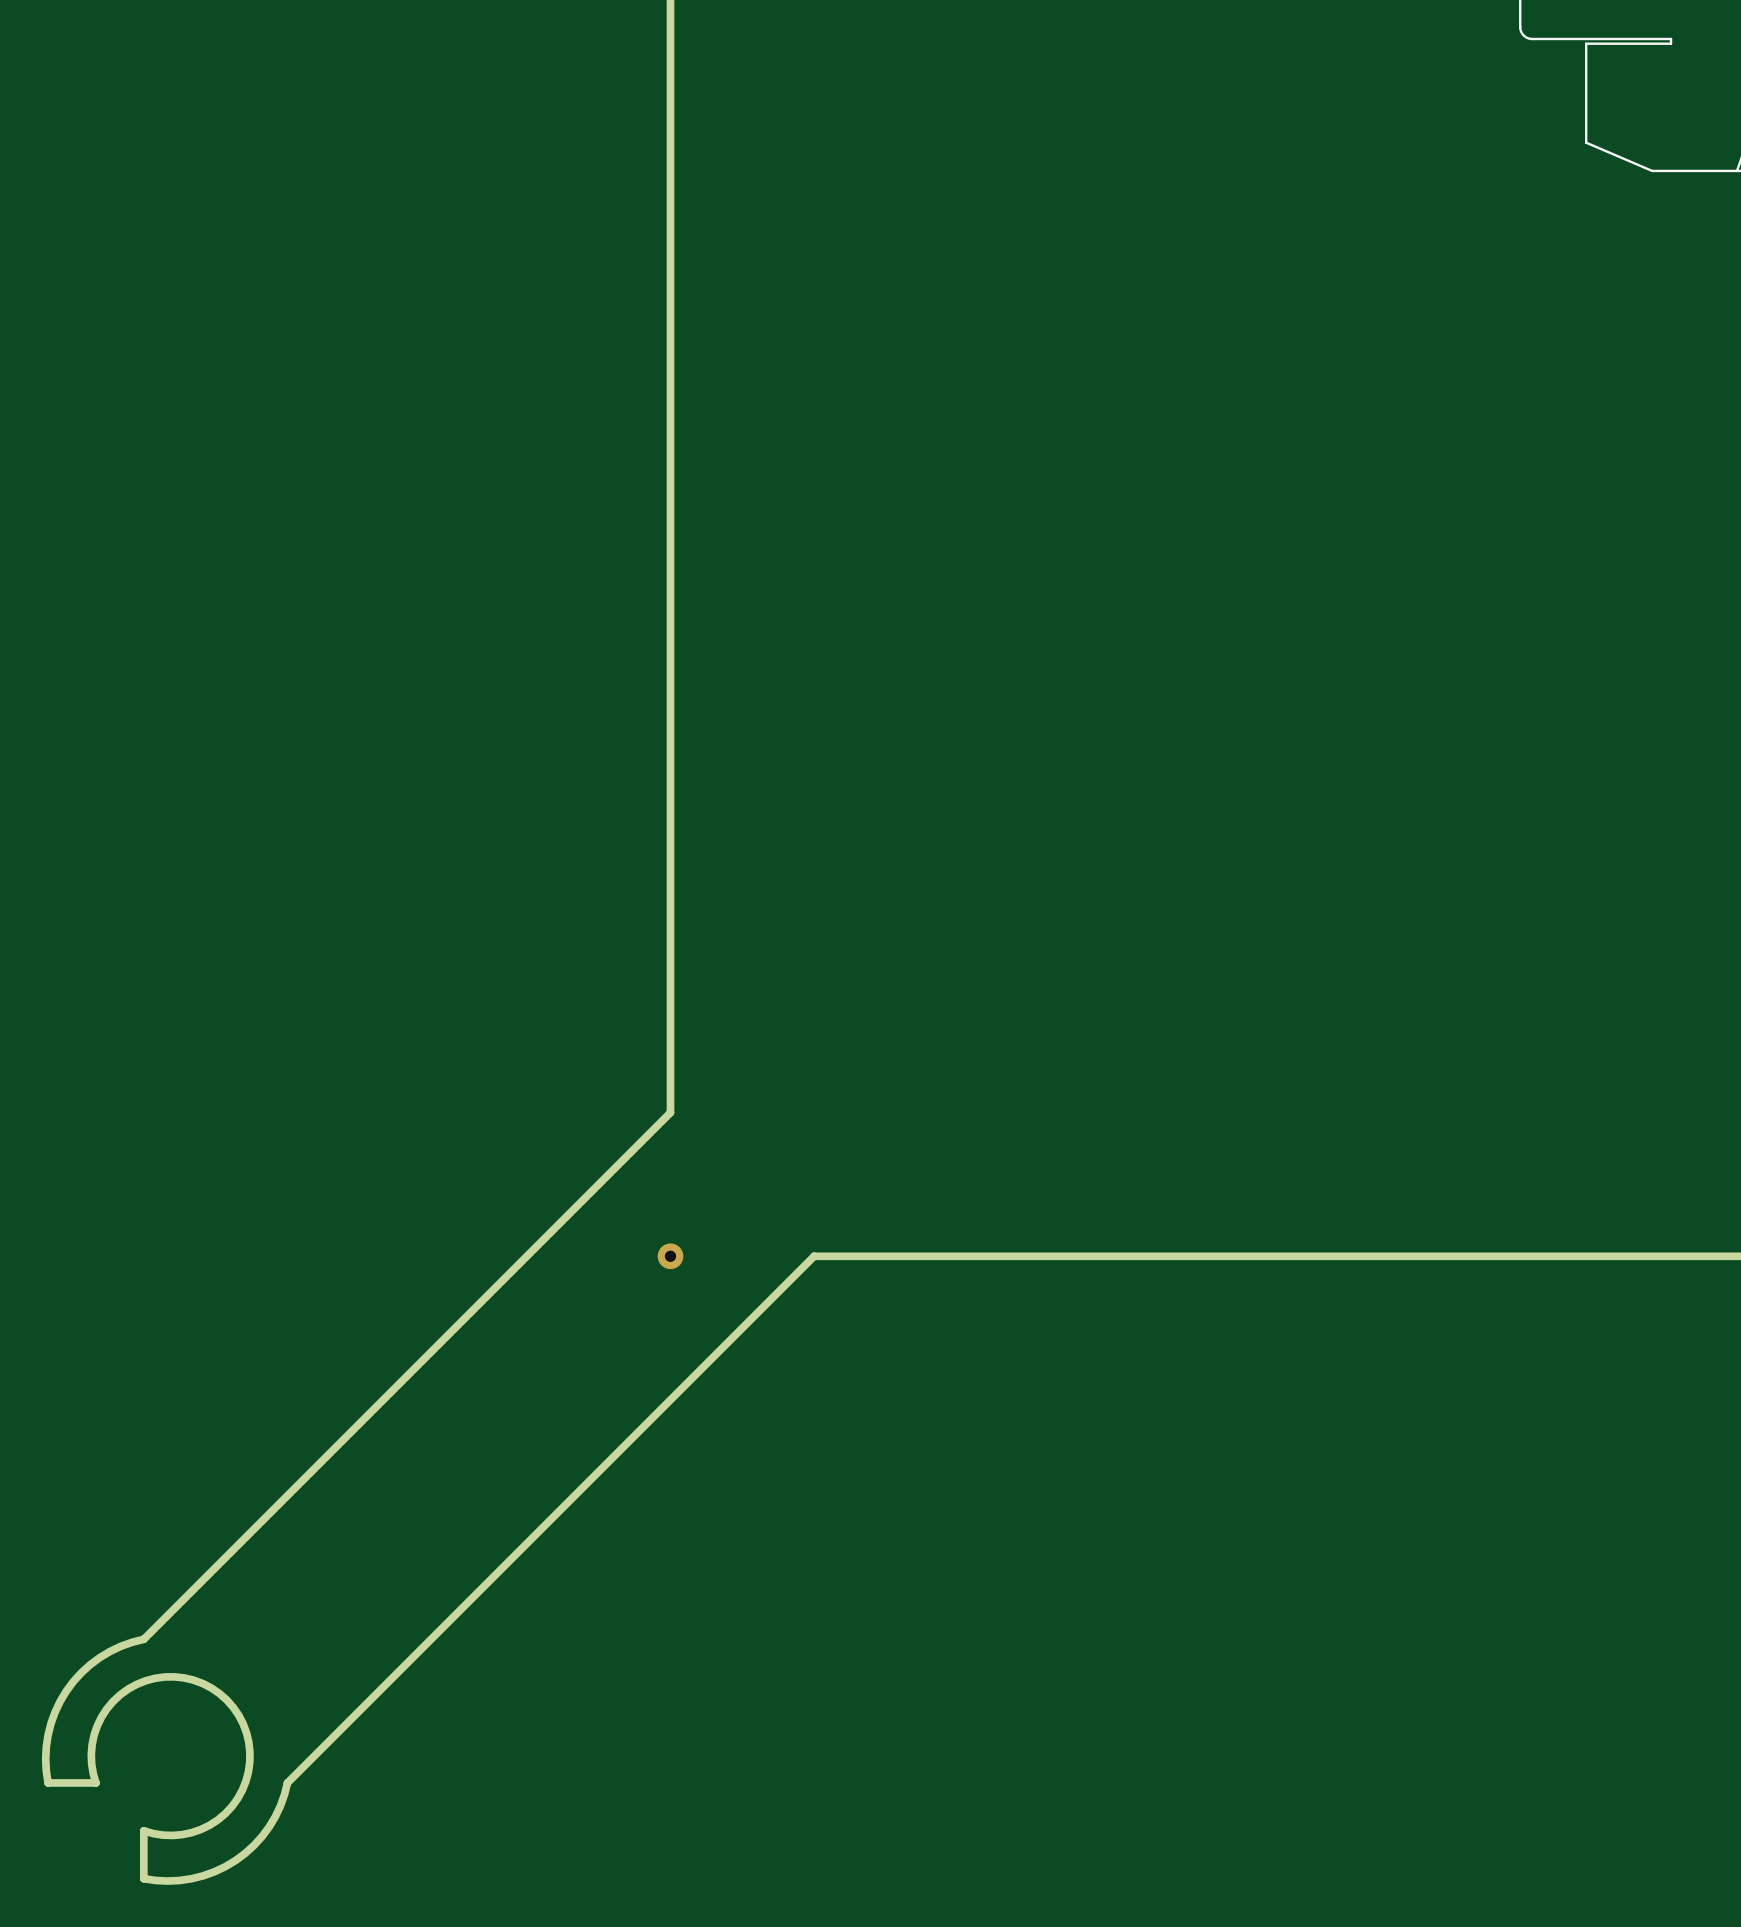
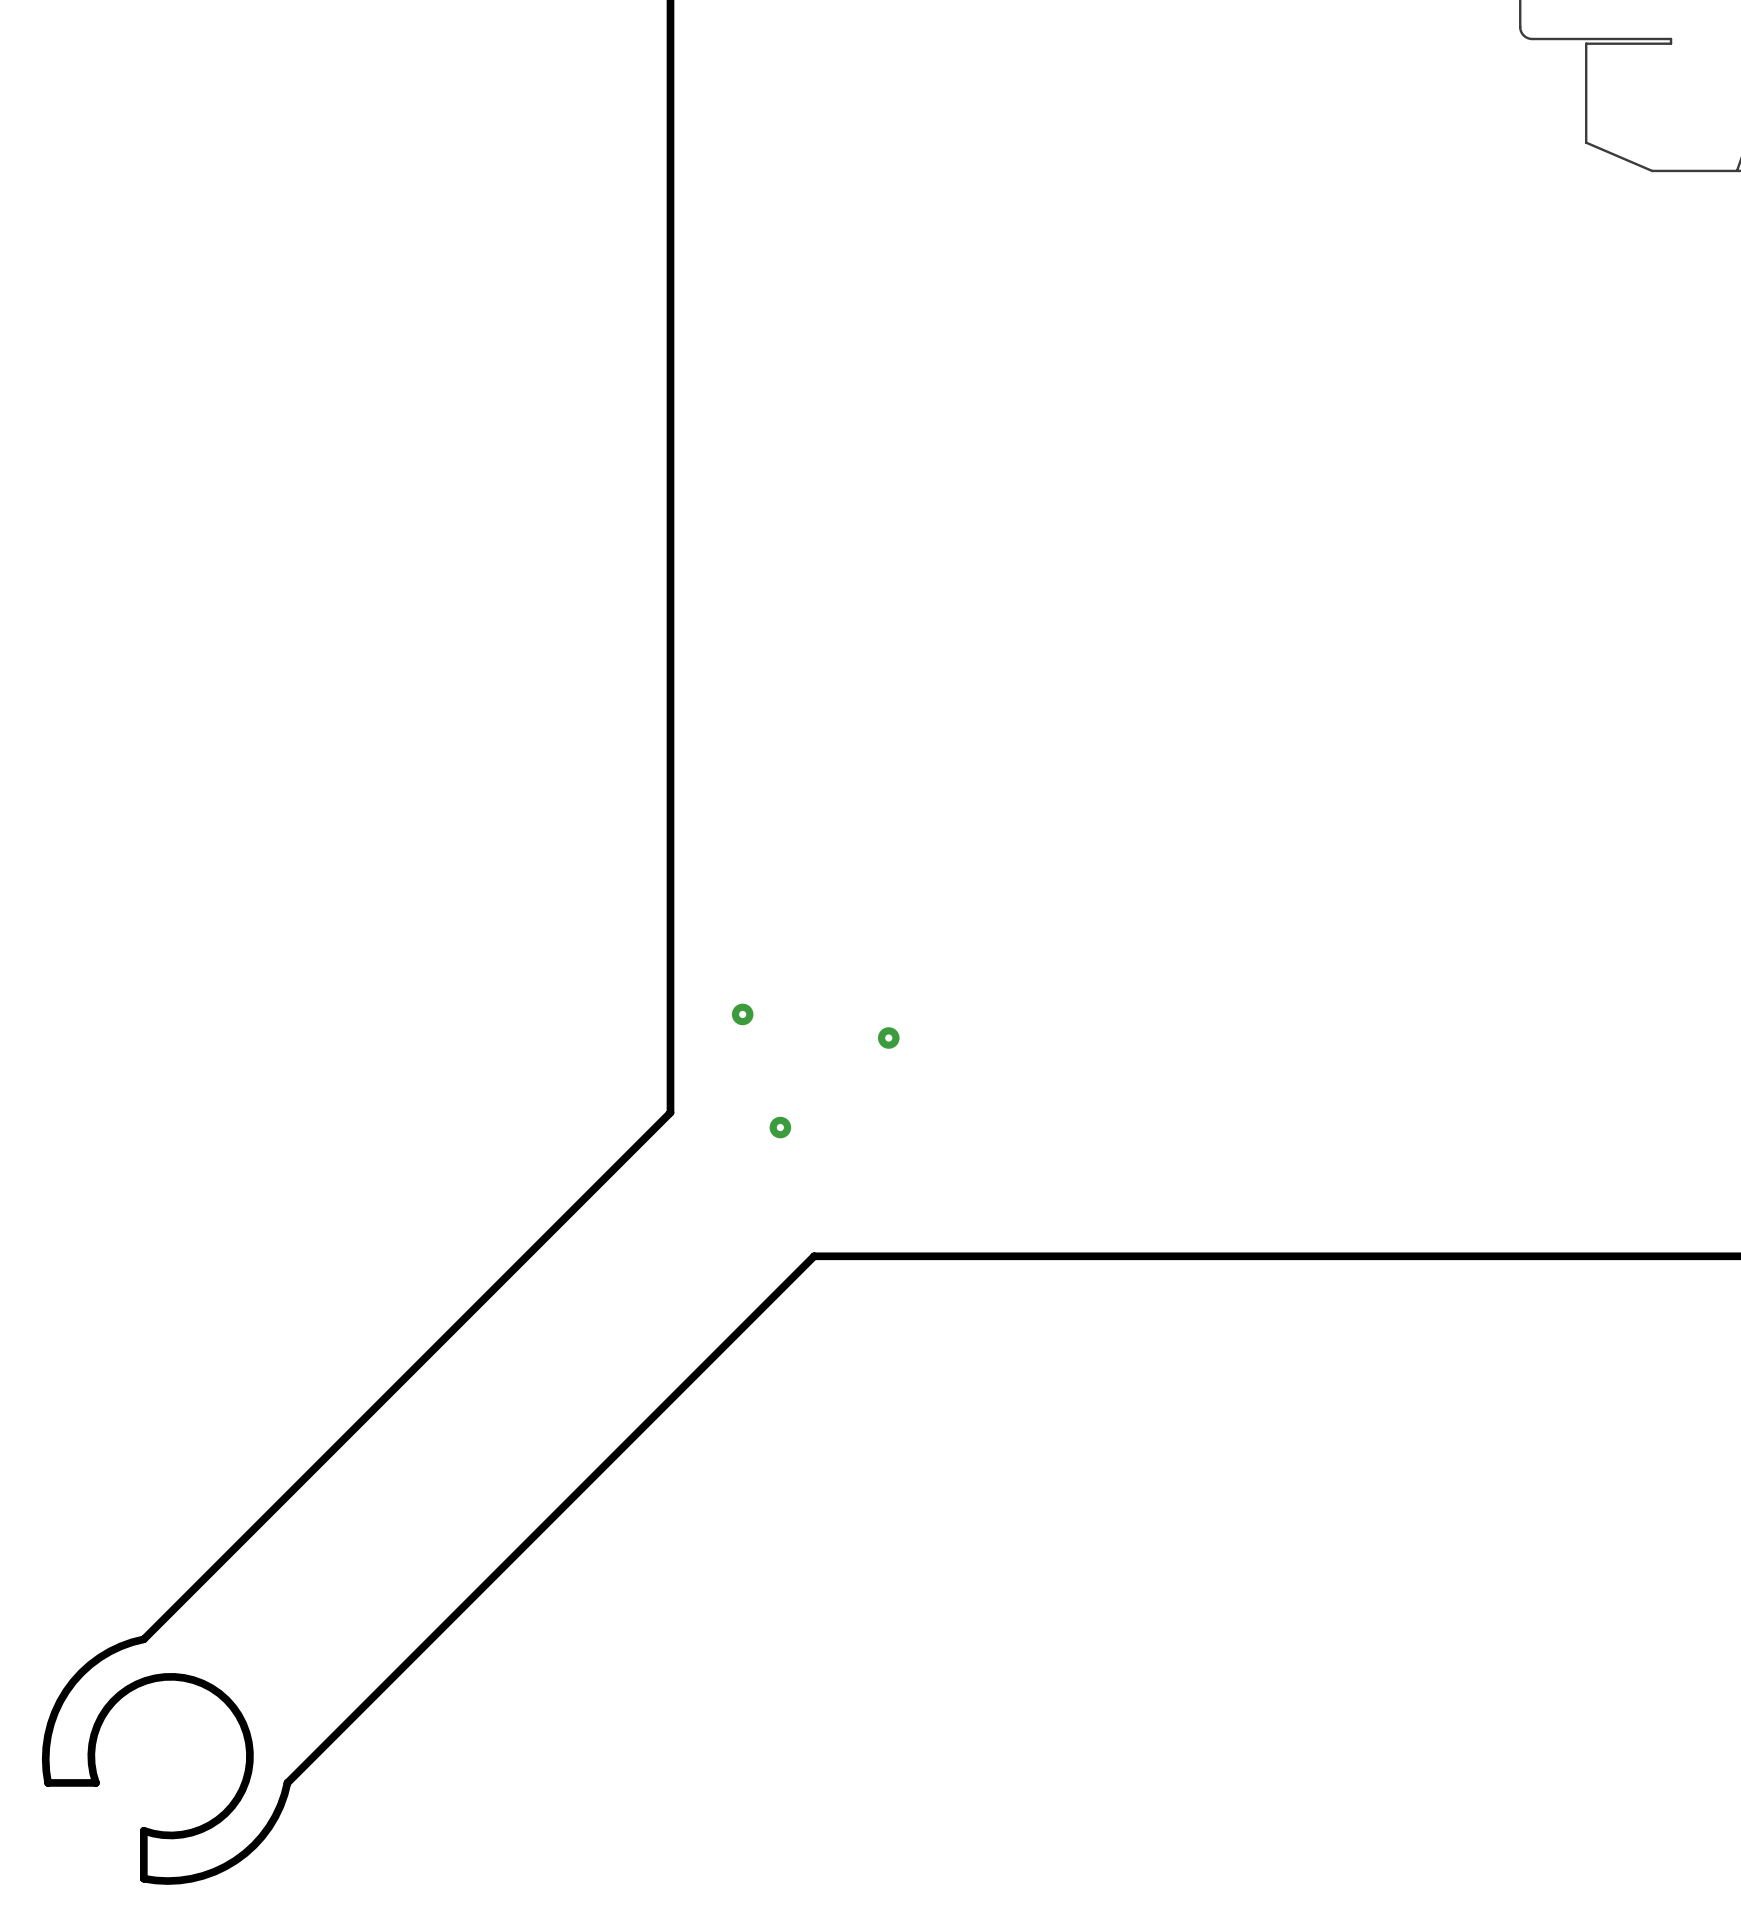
via: none -> (742, 1014)
via: none -> (888, 1038)
via: none -> (780, 1127)
via: (670, 1256) -> none

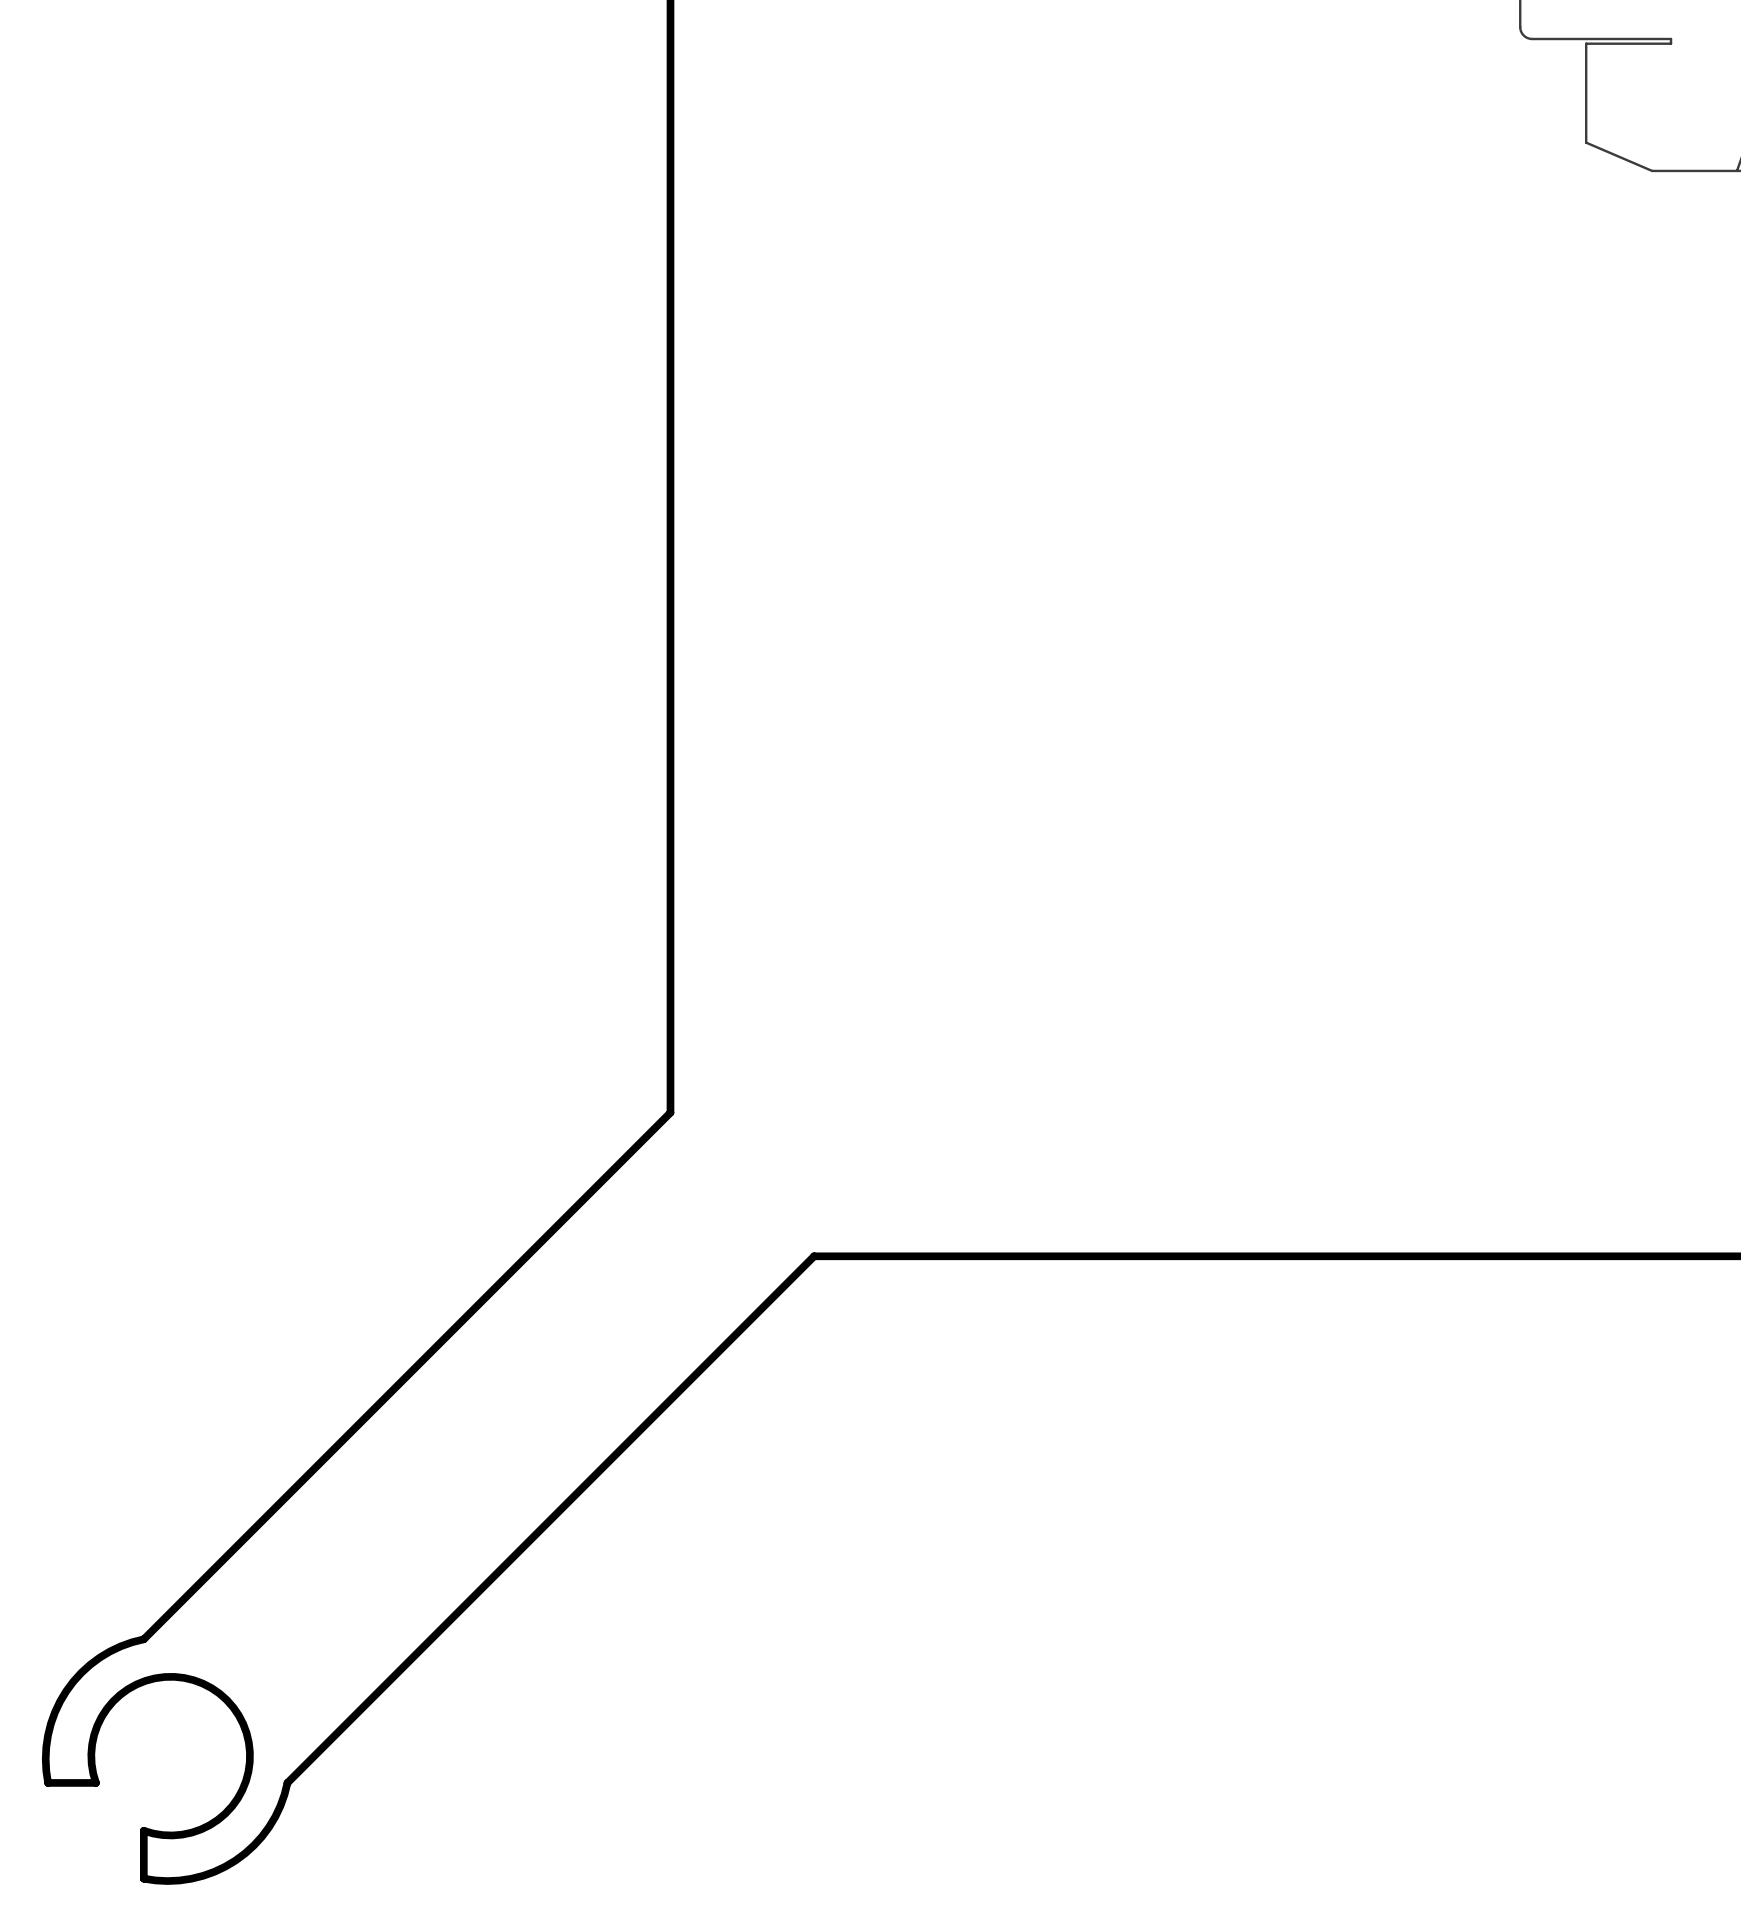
via: (742, 1014) -> none
via: (888, 1038) -> none
via: (780, 1127) -> none

